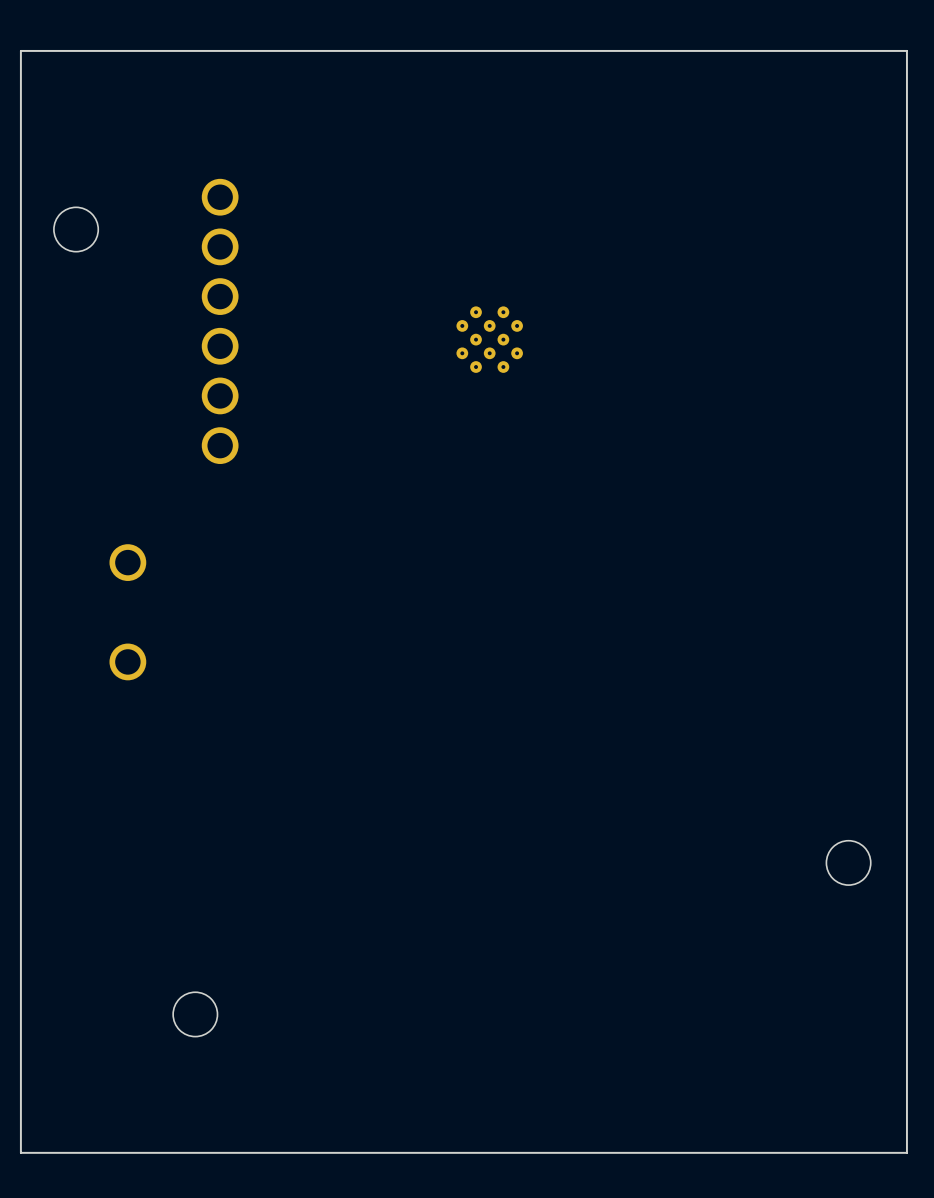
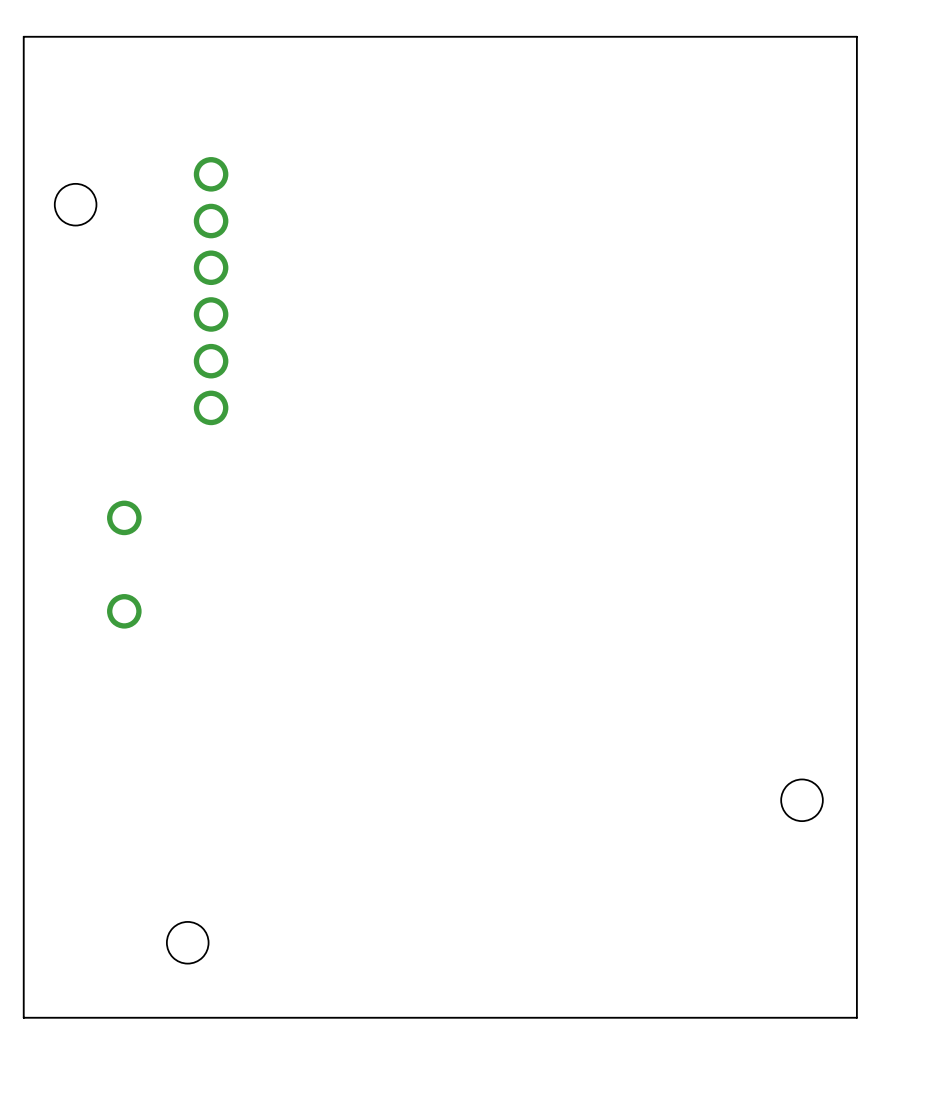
part: (489, 339) -> none
board edge: (906, 1094) (906, 1152) (20, 1152) (20, 1094) -> (856, 1017) (23, 1017)

